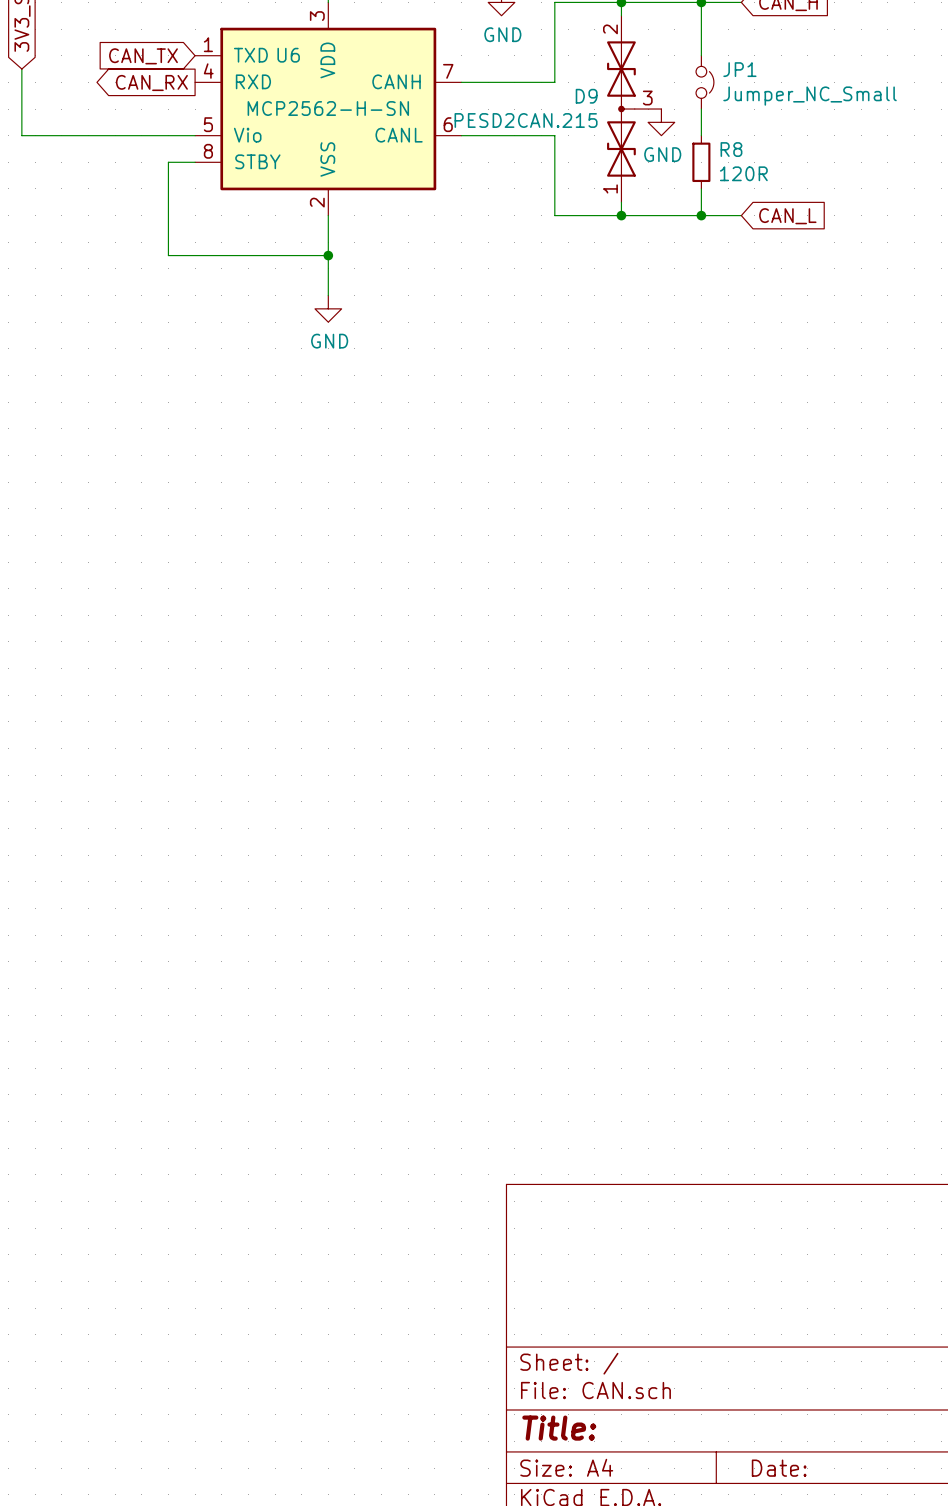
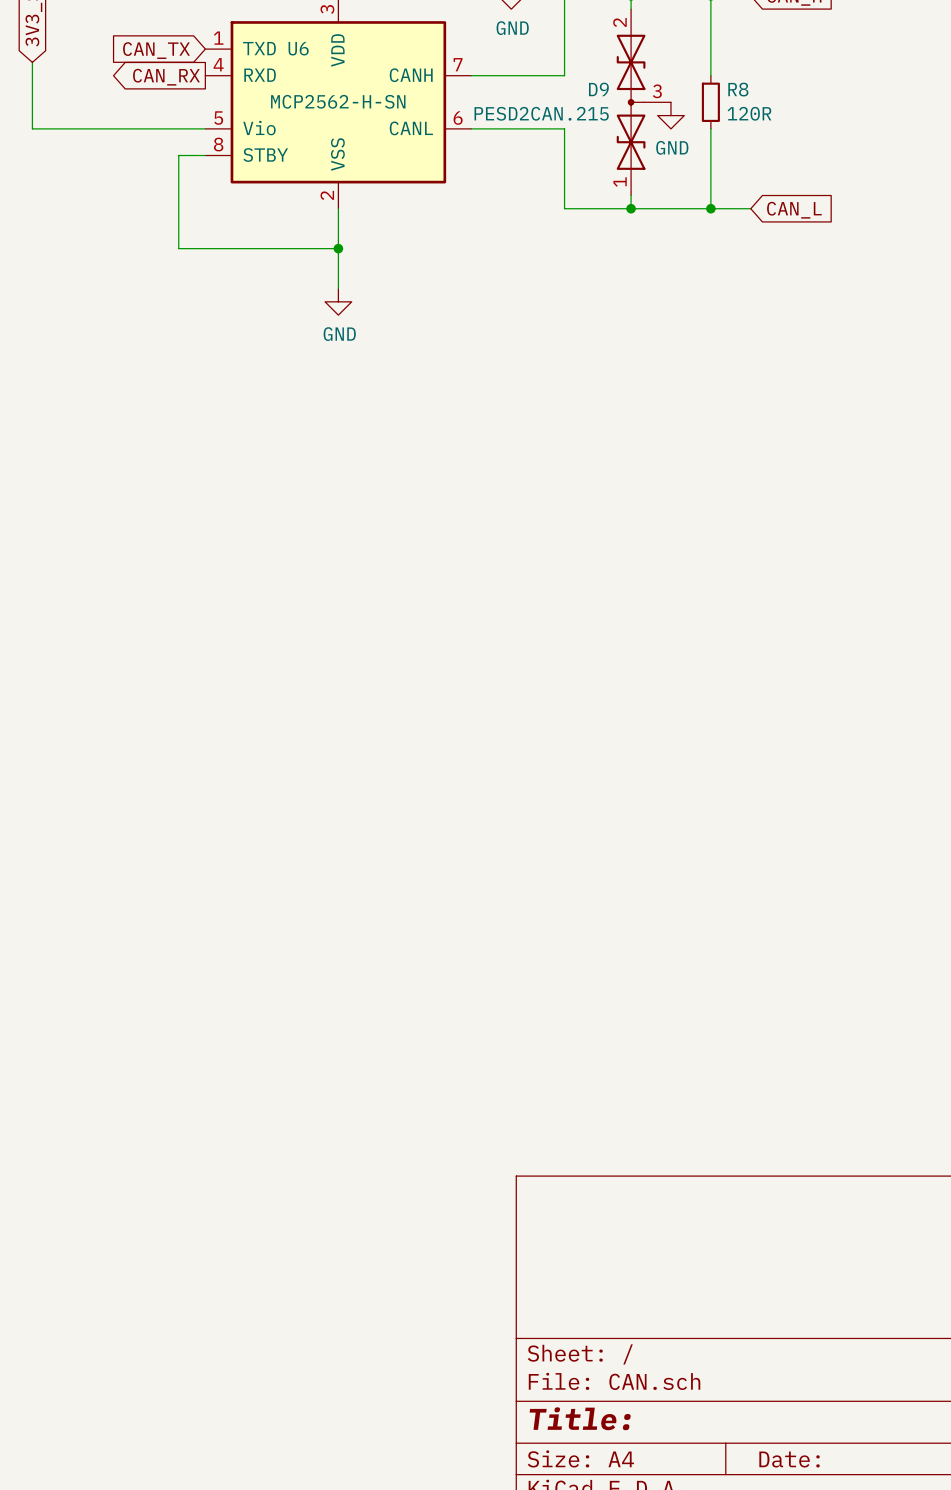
wire: none -> (710, 49) (710, 75)
JP1: Jumper_NC_Small (704, 82) -> none
wire: (701, 109) (701, 135) -> (710, 182) (710, 128)
R8 position: (701, 162) -> (710, 102)

